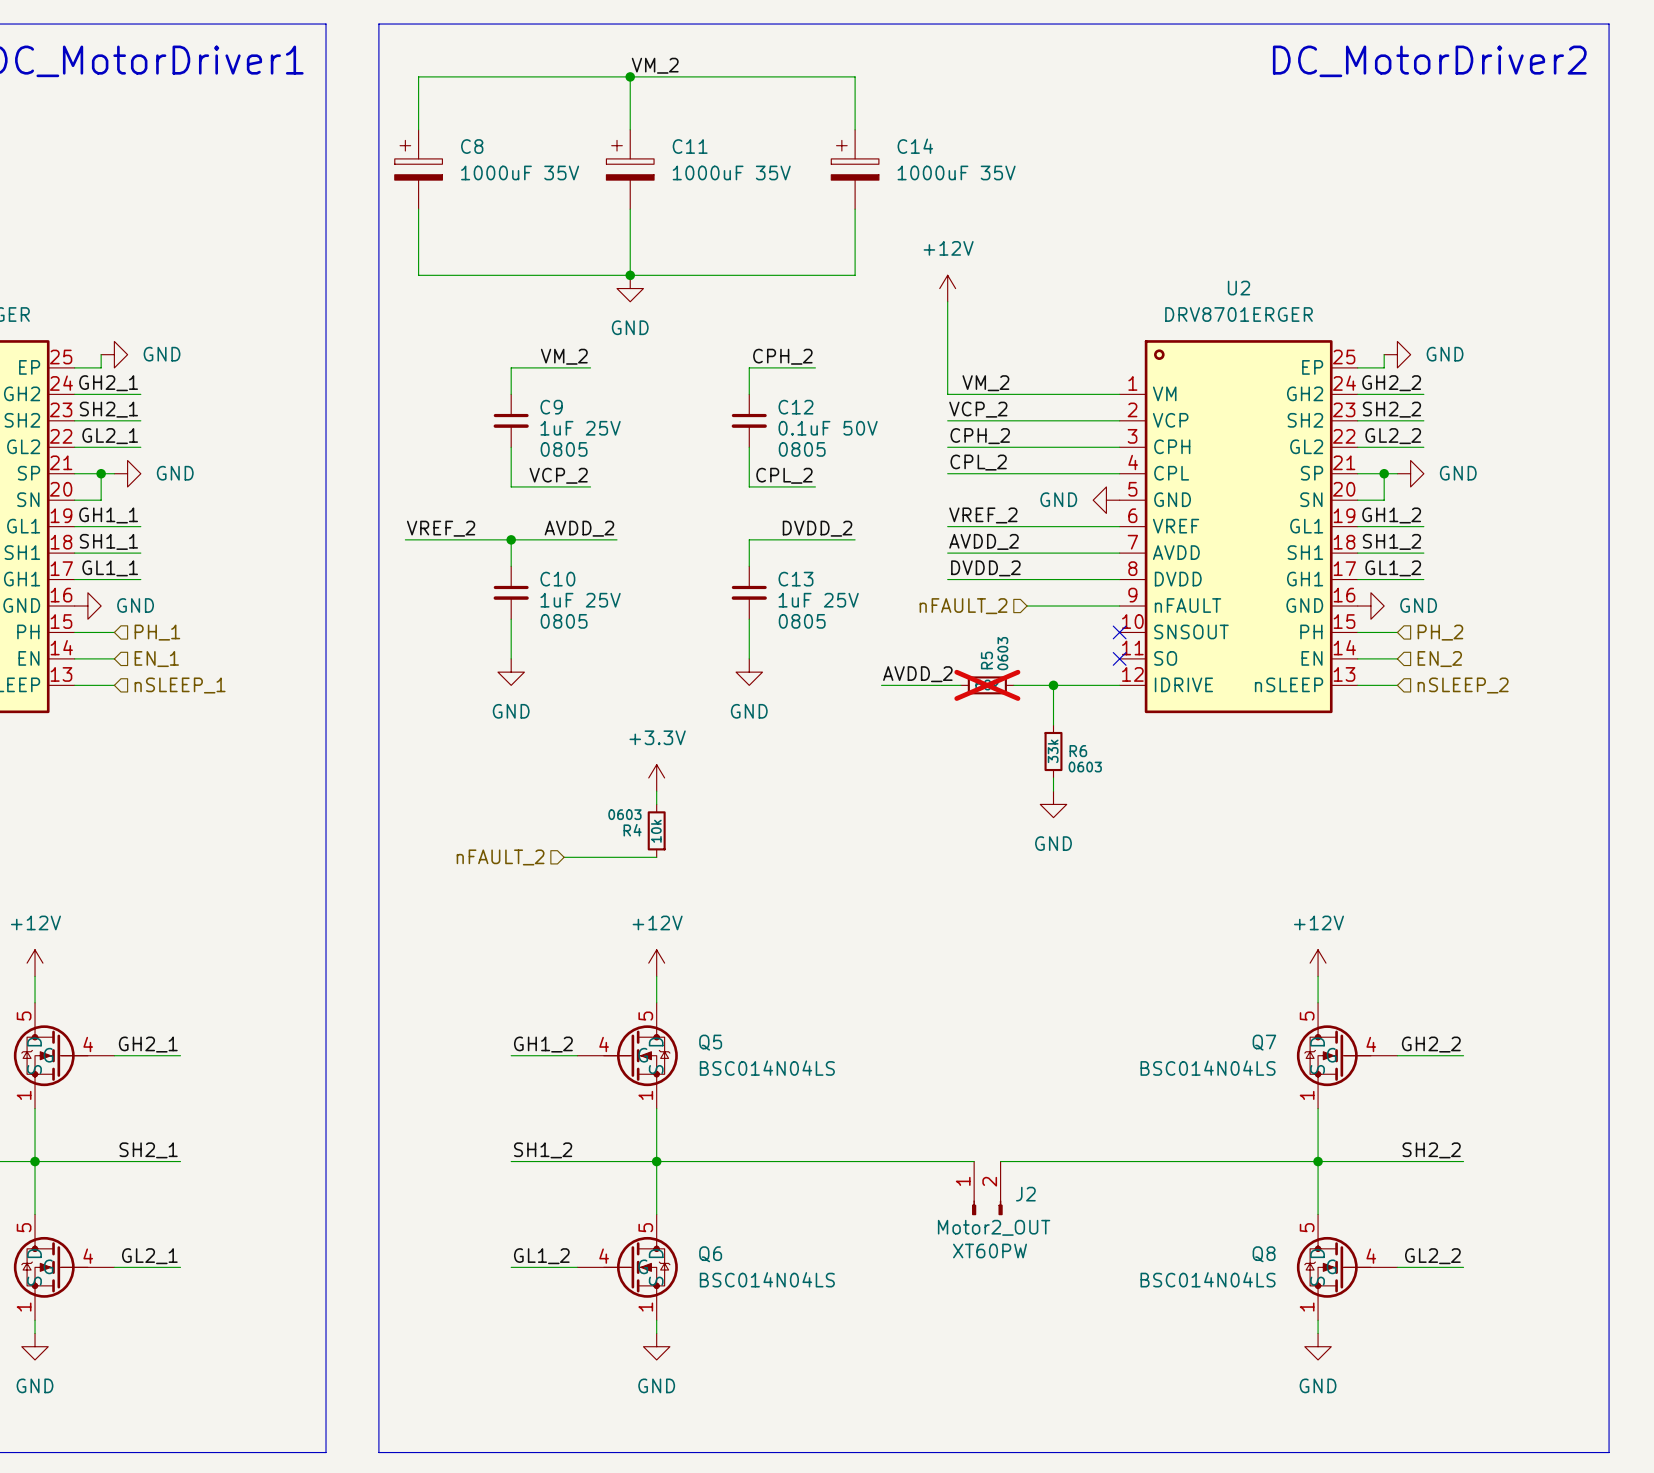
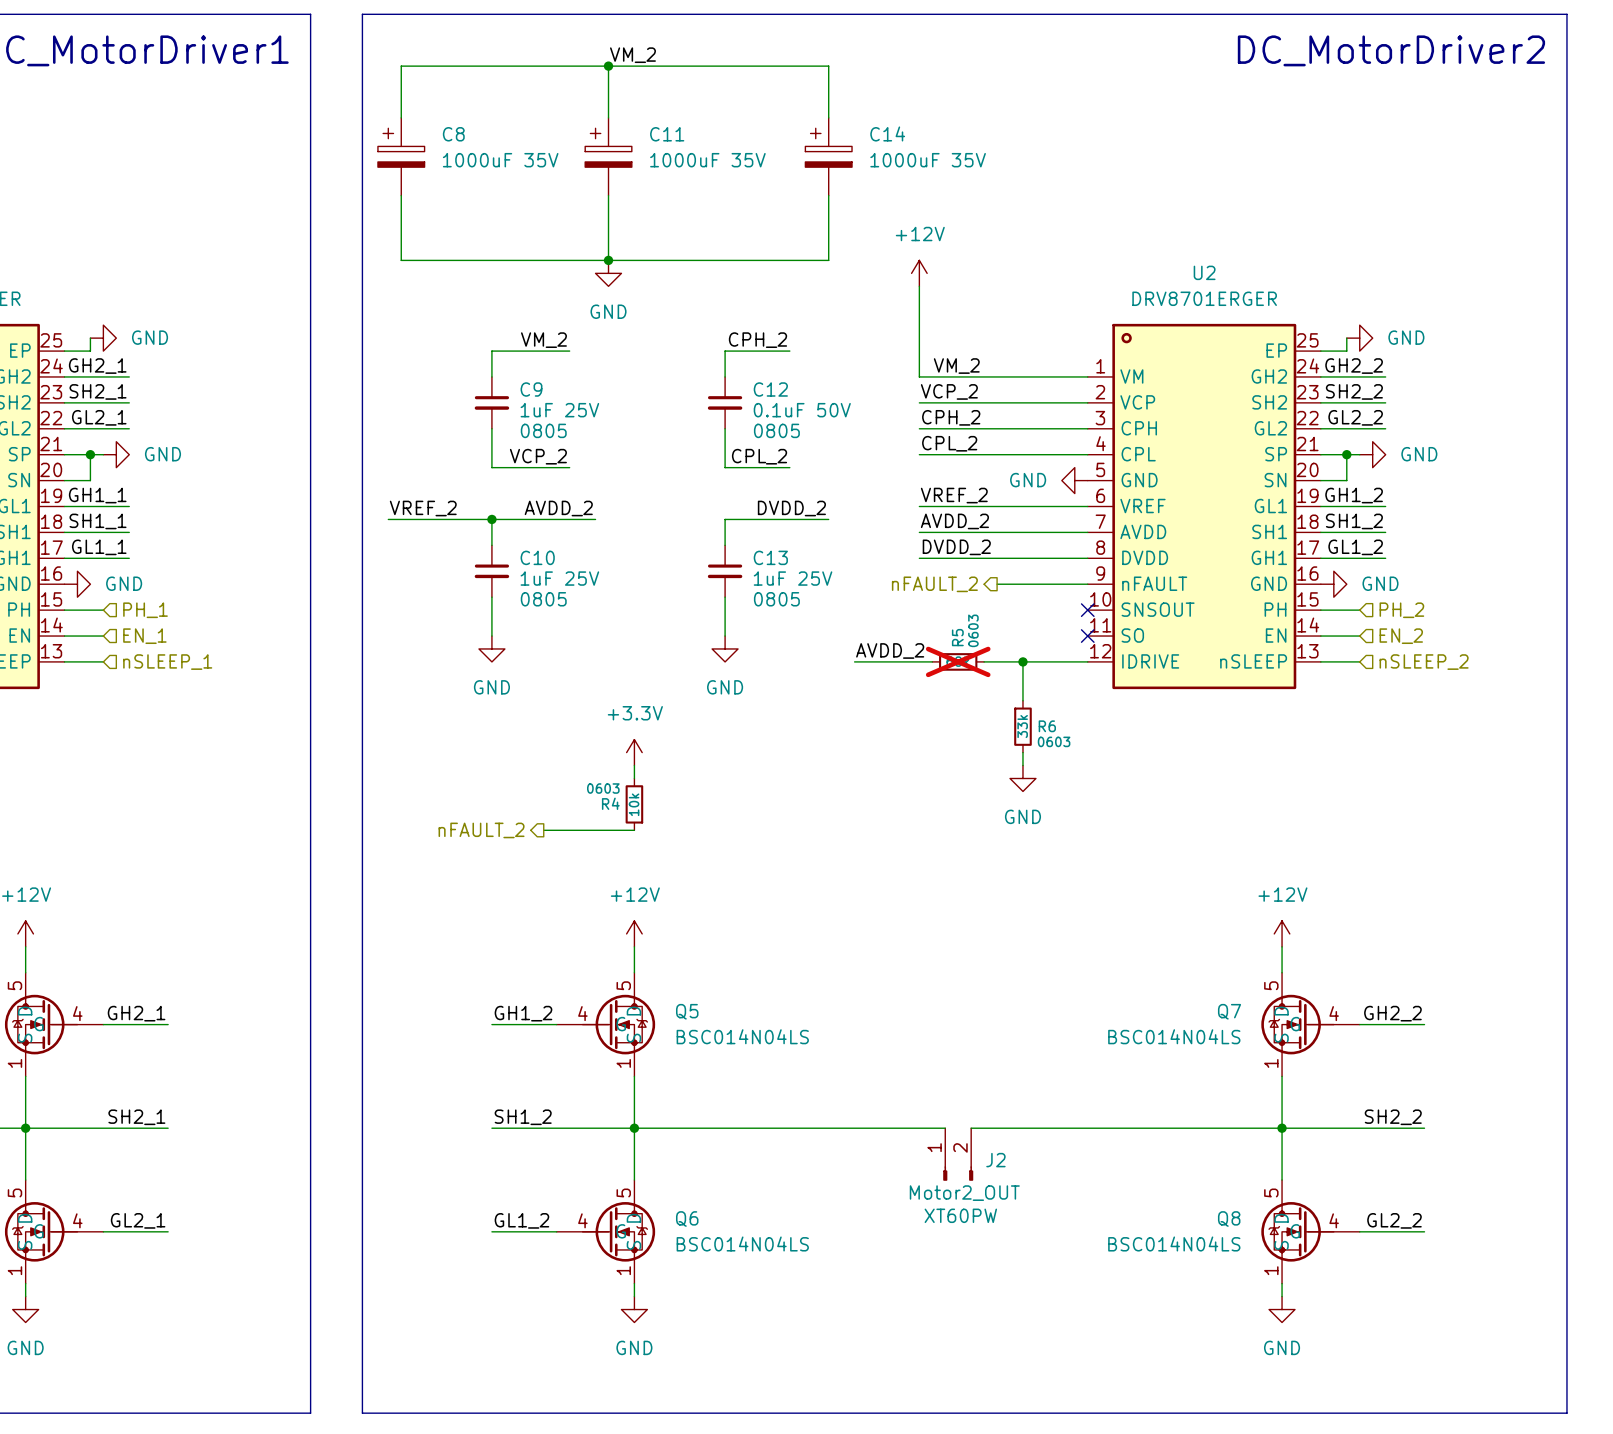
hierarchical label shape: input (963, 606) -> output (934, 584)
hierarchical label shape: input (500, 857) -> output (481, 830)

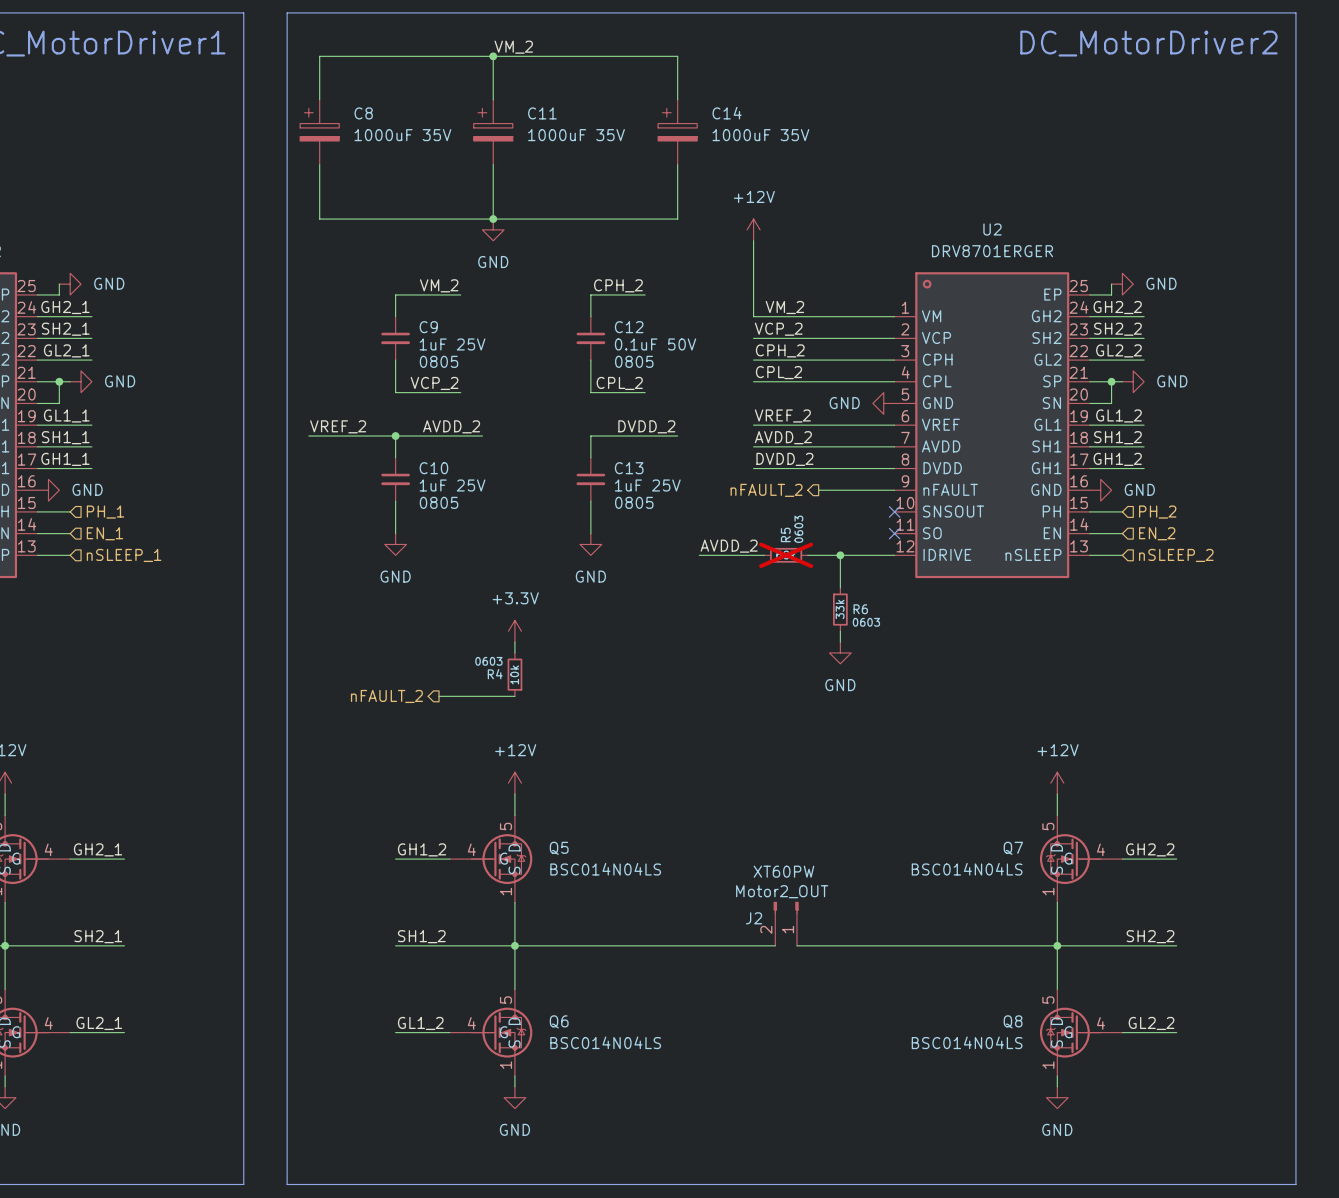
label: GH1_1 (97, 495) -> GL1_1 (66, 415)
label: GH1_2 (1354, 495) -> GL1_2 (1118, 415)
label: GL1_1 (99, 547) -> GH1_1 (65, 459)
label: GL1_2 (1355, 547) -> GH1_2 (1117, 459)
J2 position: (958, 1154) -> (786, 923)
J2 rotation: 0° (958, 1173) -> 180° (786, 907)

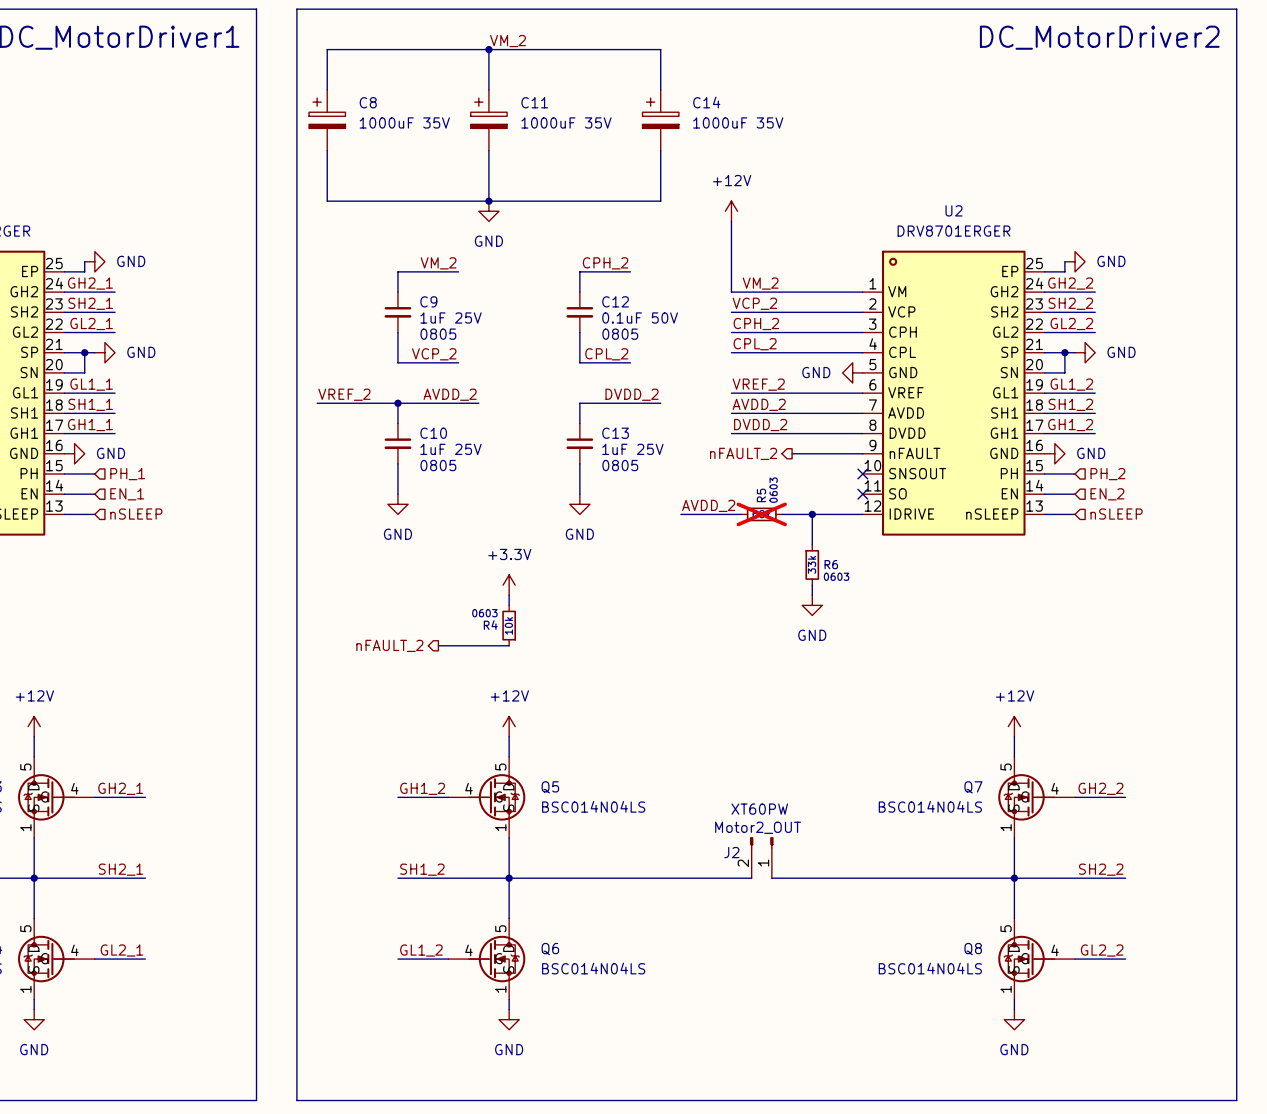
hierarchical label: nSLEEP_1 (124, 555) -> nSLEEP (136, 514)
hierarchical label: nSLEEP_2 (1176, 555) -> nSLEEP (1116, 514)

